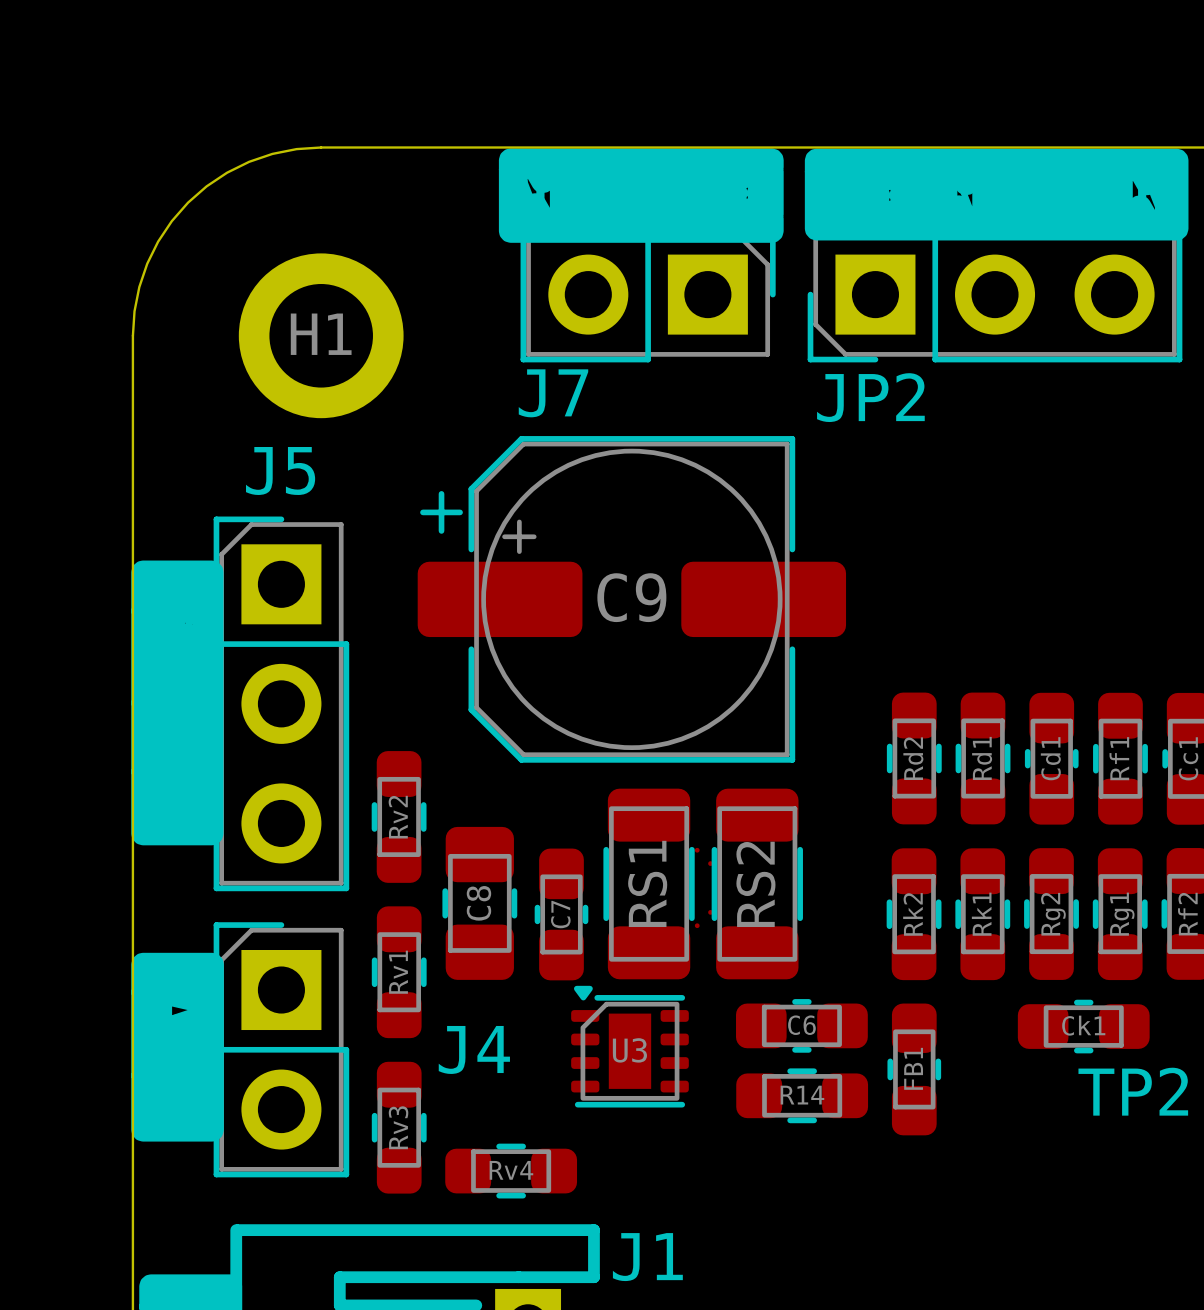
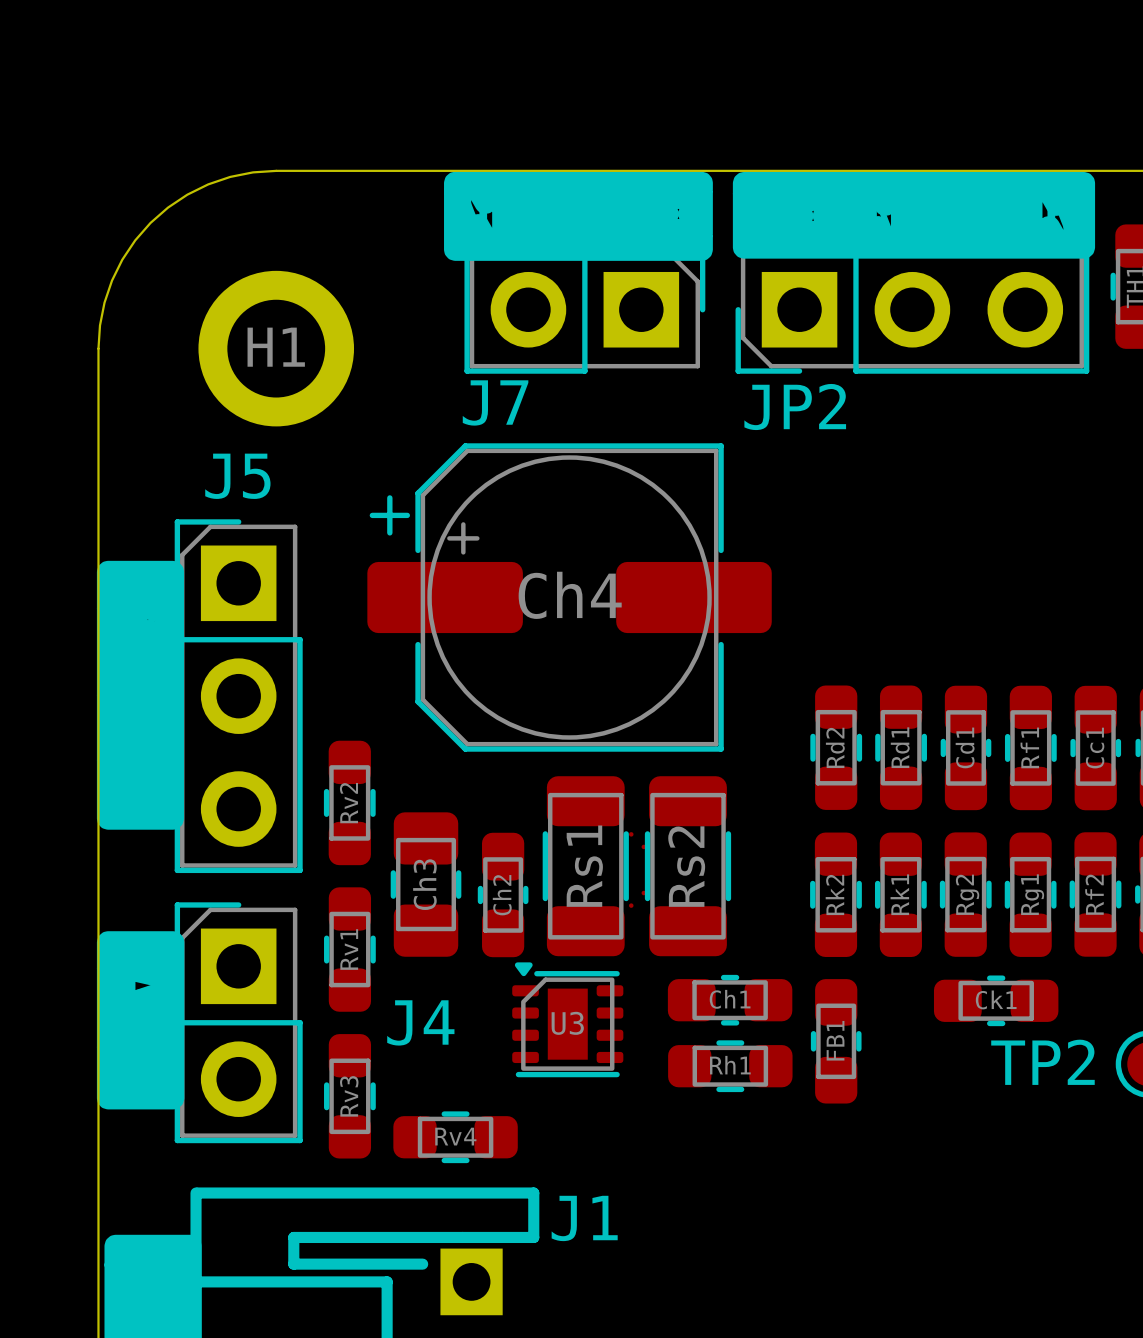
C9 name: C9 (631, 597) -> Ch4 (570, 595)
RS1 name: RS1 (647, 883) -> Rs1 (584, 866)
RS2 name: RS2 (755, 884) -> Rs2 (686, 866)
C8 name: C8 (478, 903) -> Ch3 (424, 884)
C7 name: C7 (560, 914) -> Ch2 (502, 895)
C6 name: C6 (801, 1025) -> Ch1 (730, 999)
R14 name: R14 (802, 1095) -> Rh1 (730, 1065)

